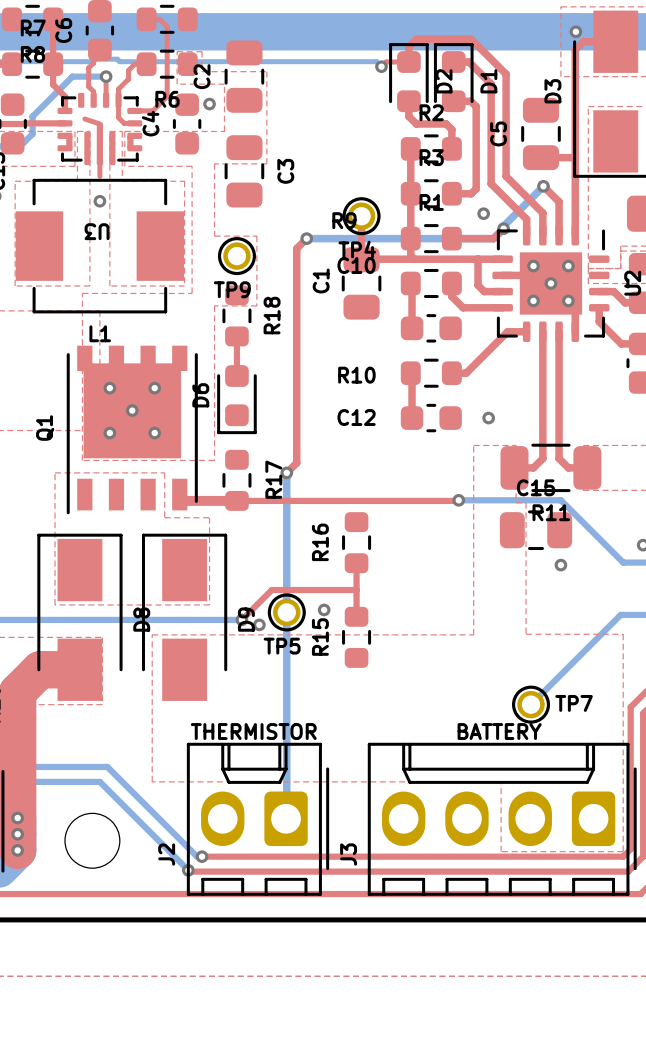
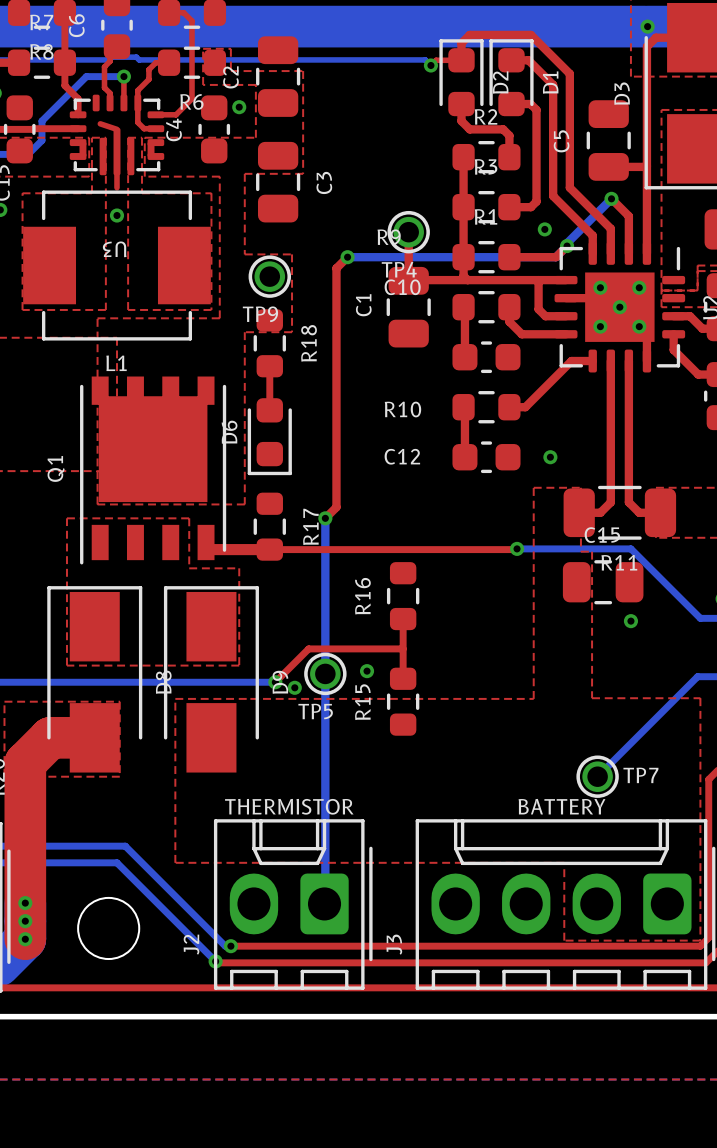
via: (109, 388) -> none
via: (154, 388) -> none
via: (132, 410) -> none
via: (109, 433) -> none
via: (154, 433) -> none

